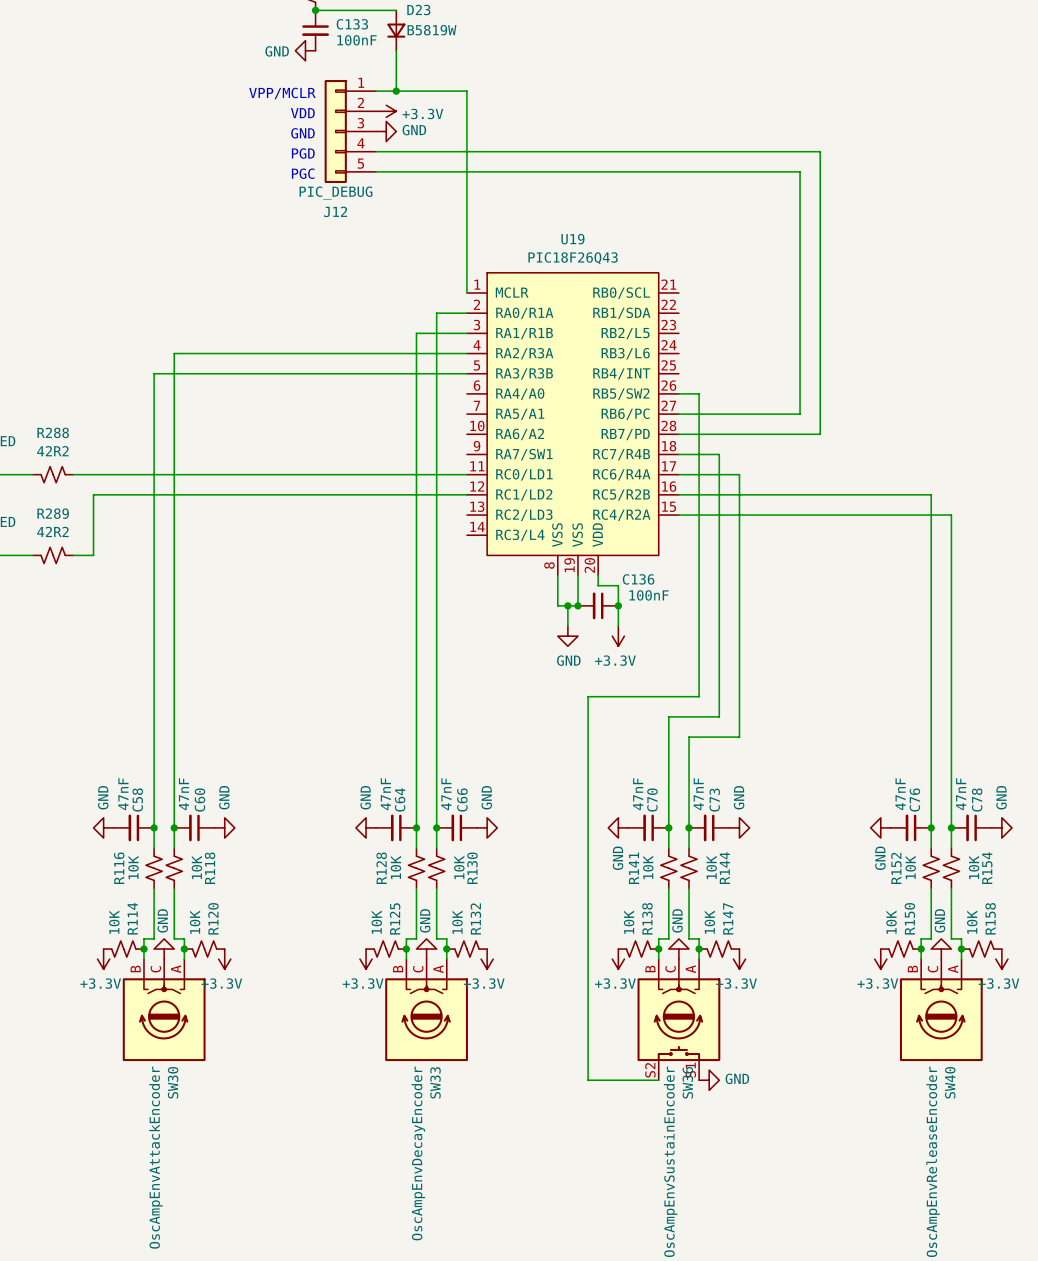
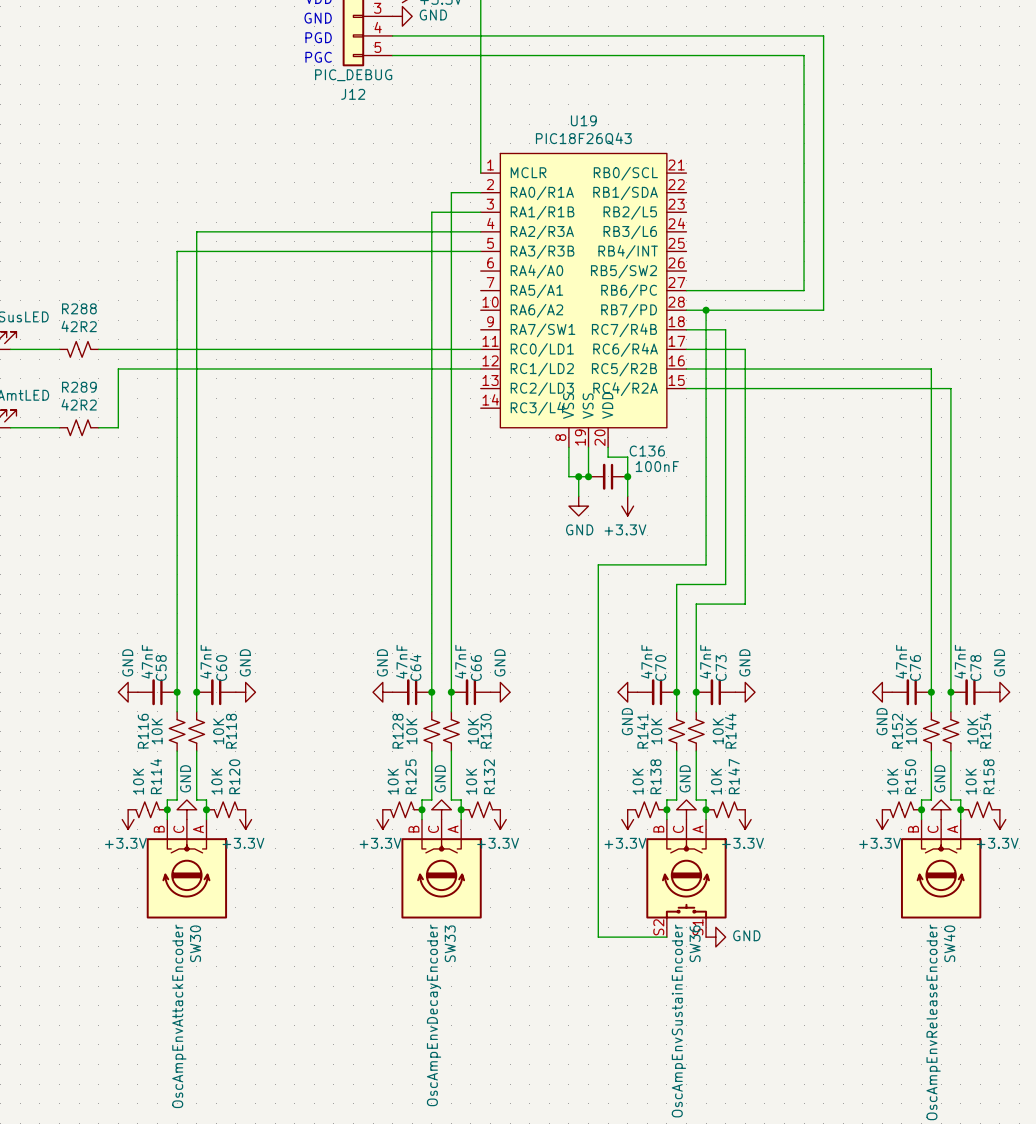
wire: (678, 393) (699, 393) (699, 434) -> none
junction: none -> (706, 310)

